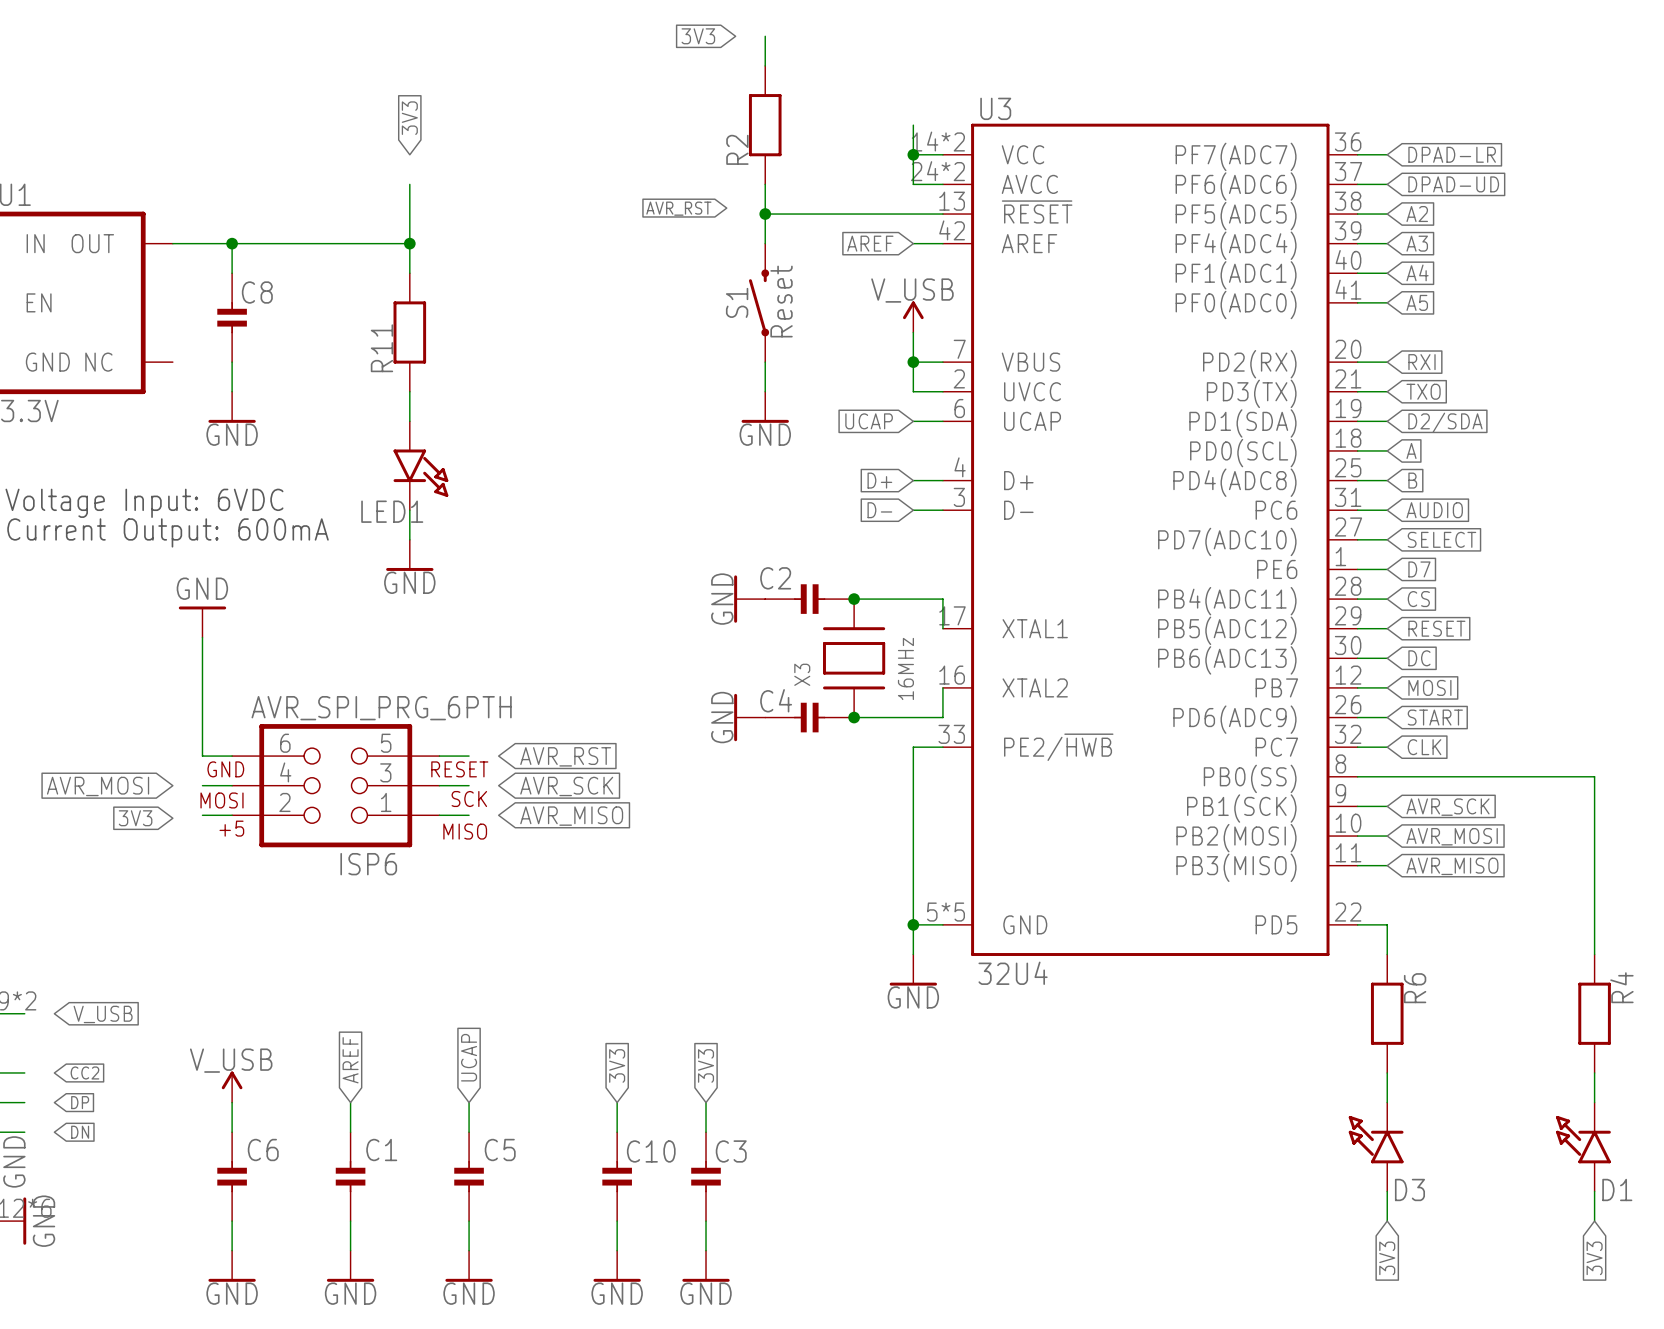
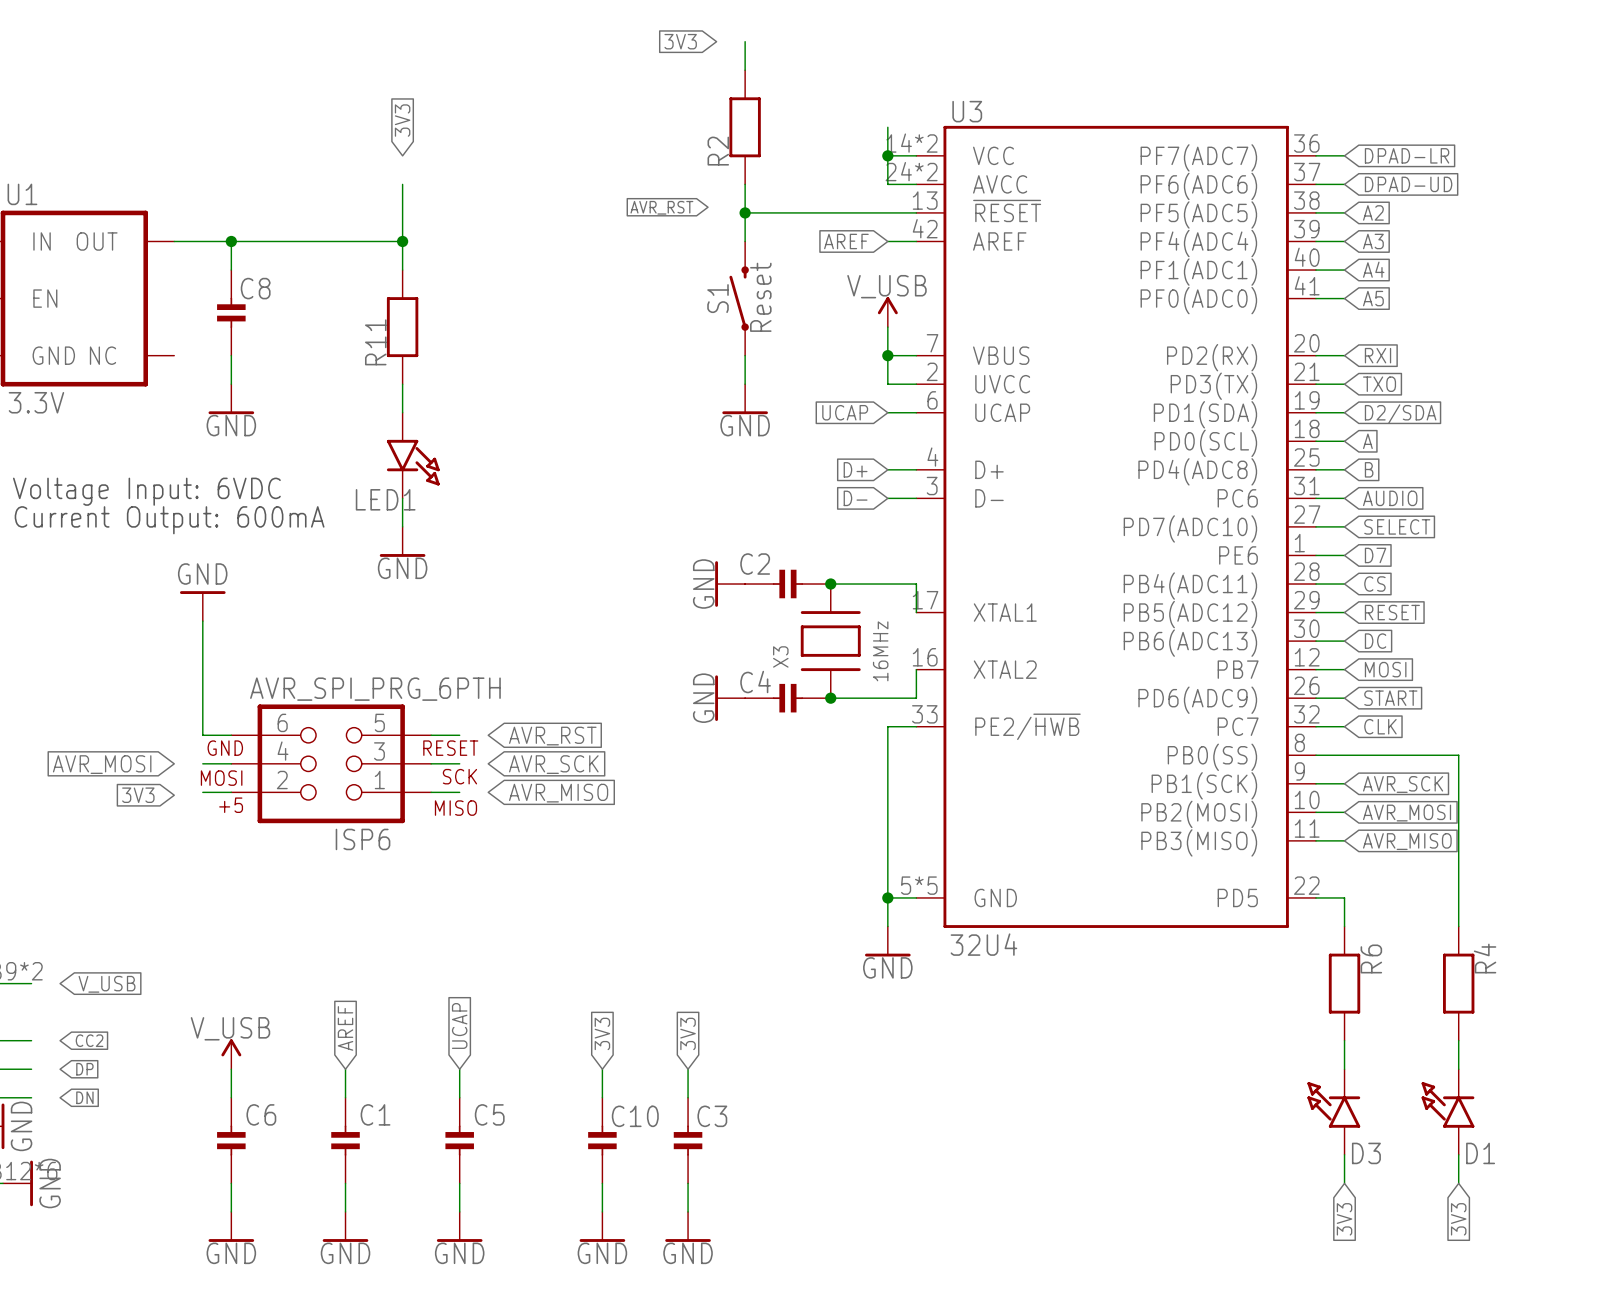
wire: (1505, 776) (1594, 776) (1594, 954) -> (1458, 755) (1458, 926)
R4 position: (1594, 1013) -> (1458, 983)
wire: (1594, 1072) (1594, 1102) -> (1458, 1040) (1458, 1069)
D1 position: (1583, 1147) -> (1447, 1112)
wire: (1594, 1191) (1594, 1221) -> (1458, 1154) (1458, 1183)
global label position: 3V3 (1594, 1258) -> 3V3 (1458, 1219)

